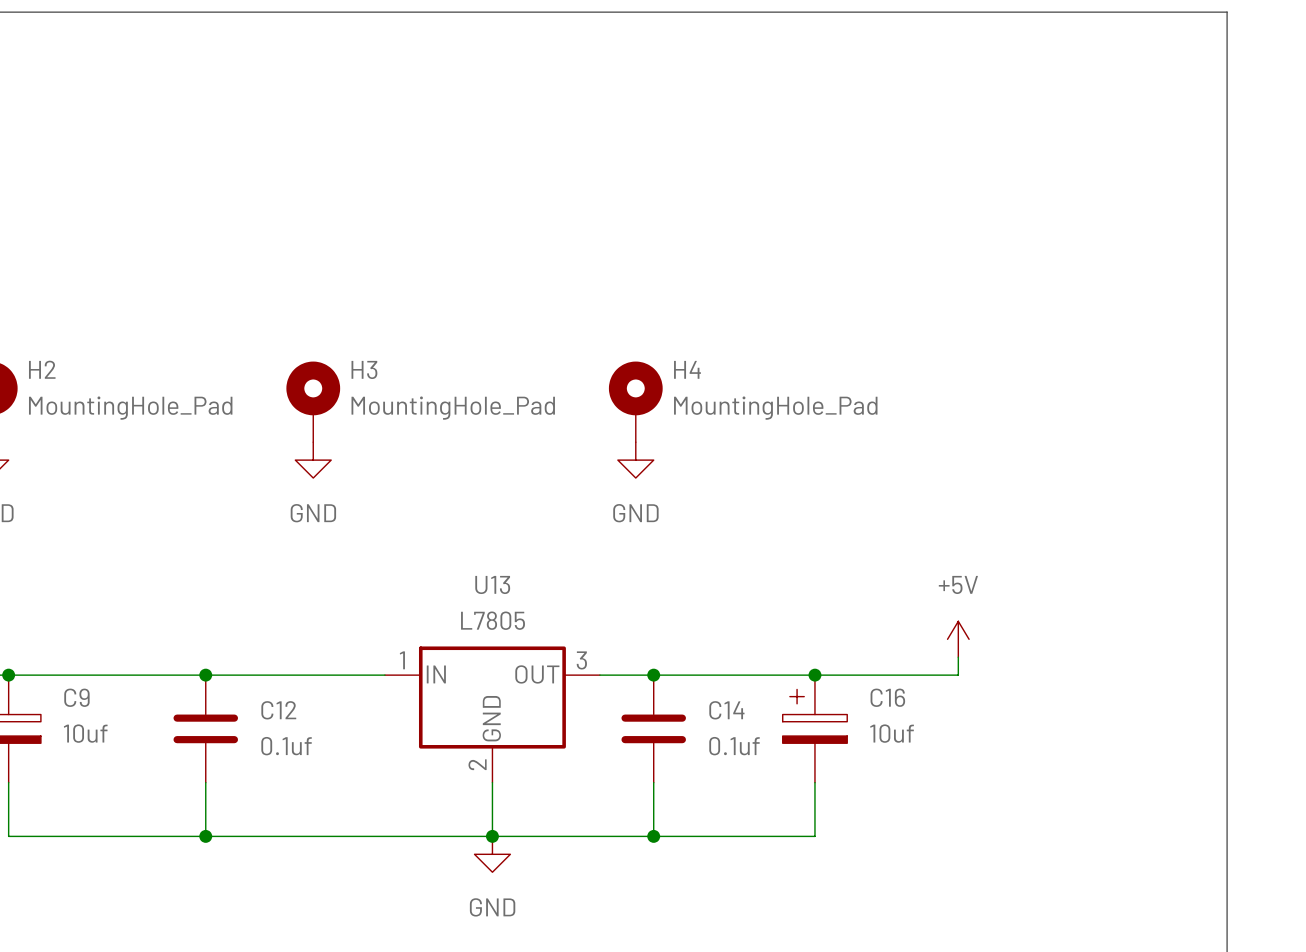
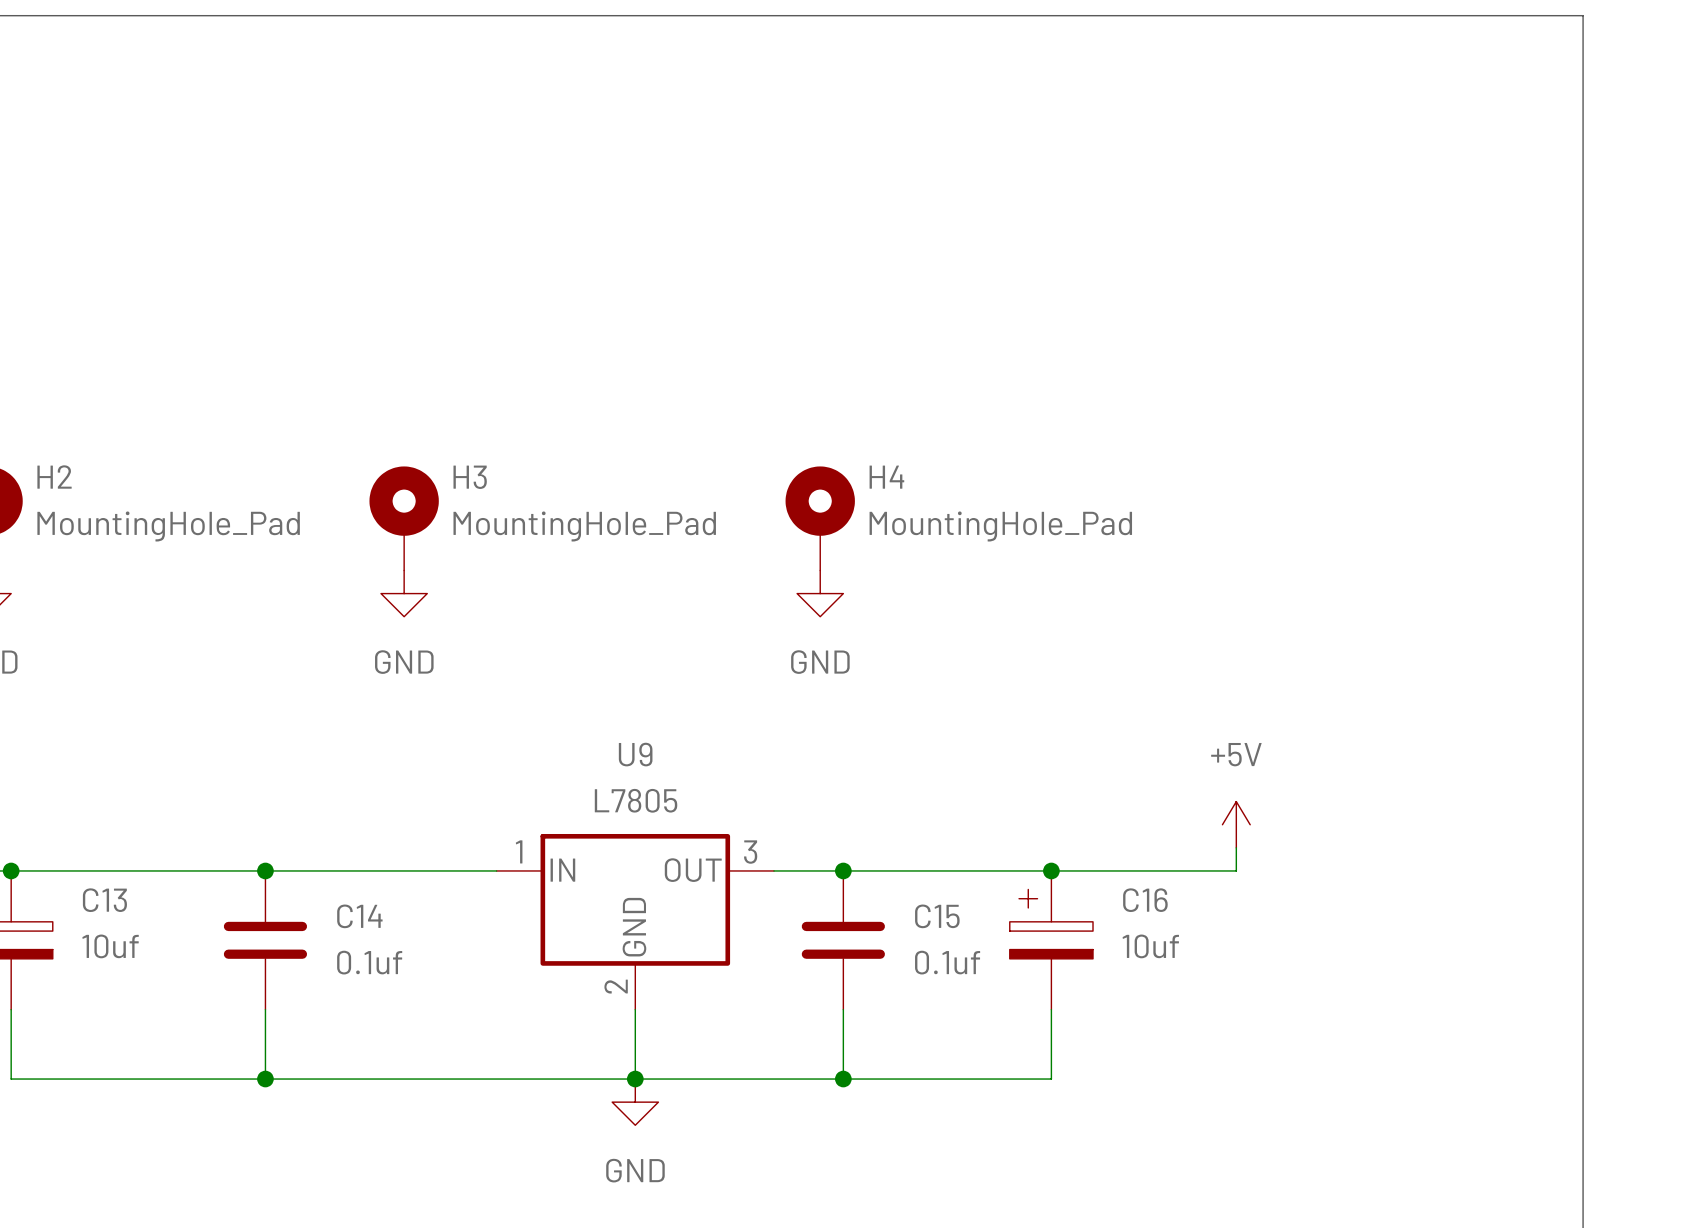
U13 name: U13 (492, 584) -> U9 (635, 754)
C9 name: C9 (76, 697) -> C13 (104, 900)
C12 name: C12 (278, 710) -> C14 (359, 916)
C14 name: C14 (726, 710) -> C15 (937, 916)

